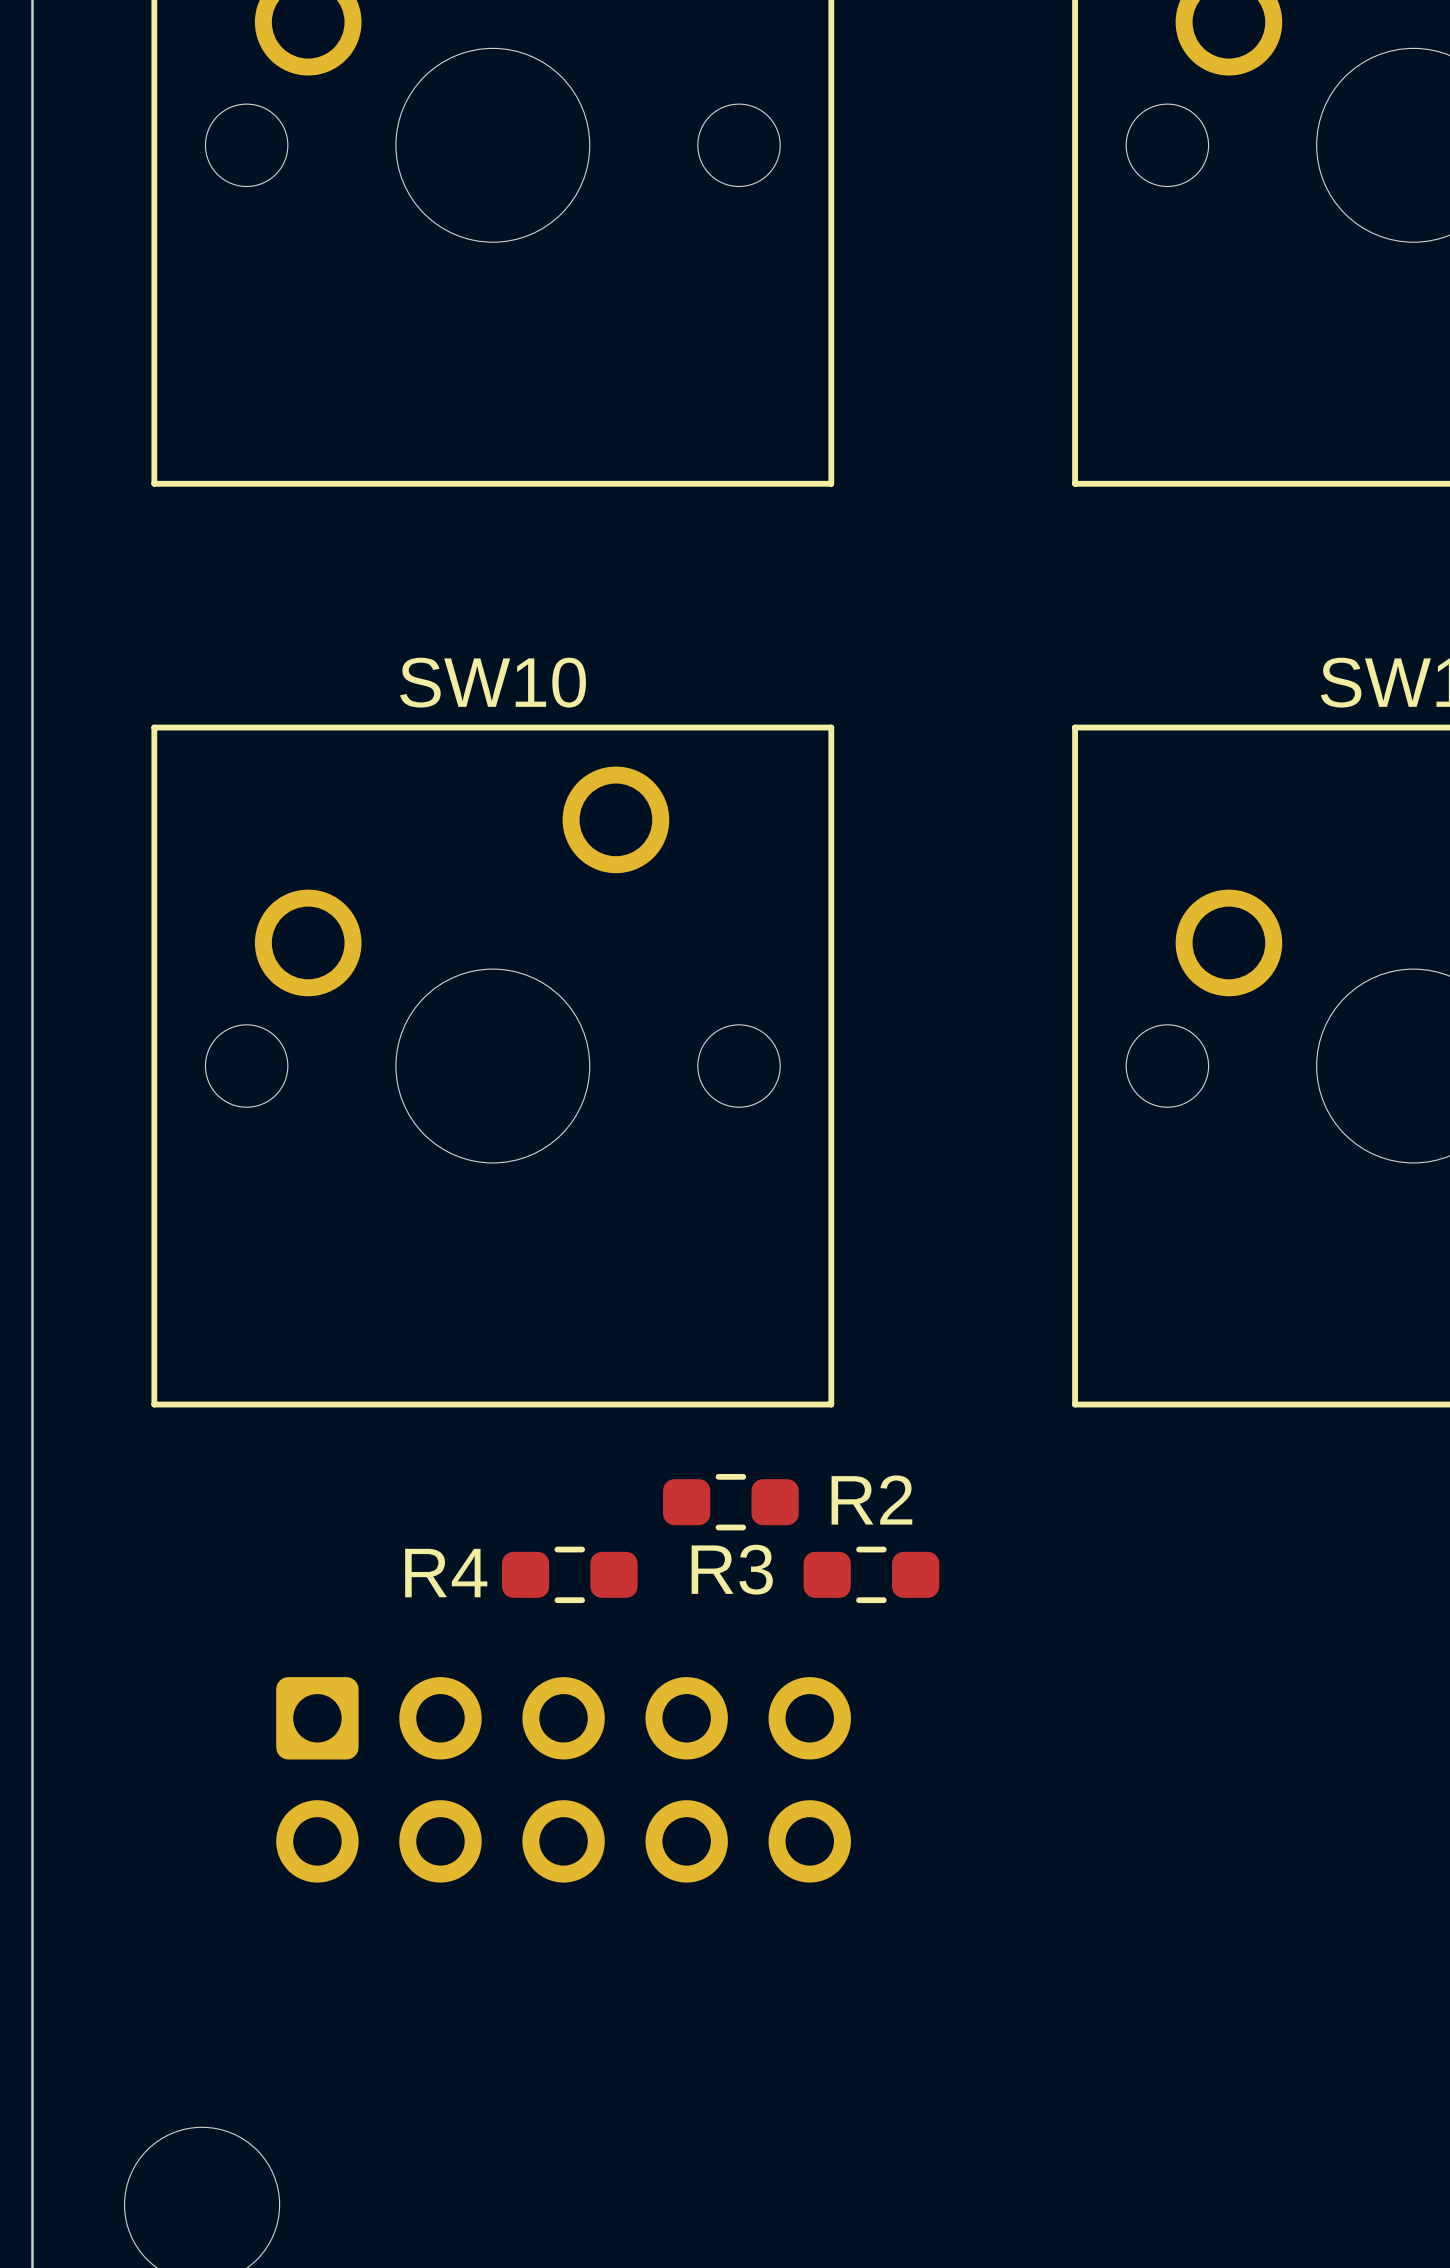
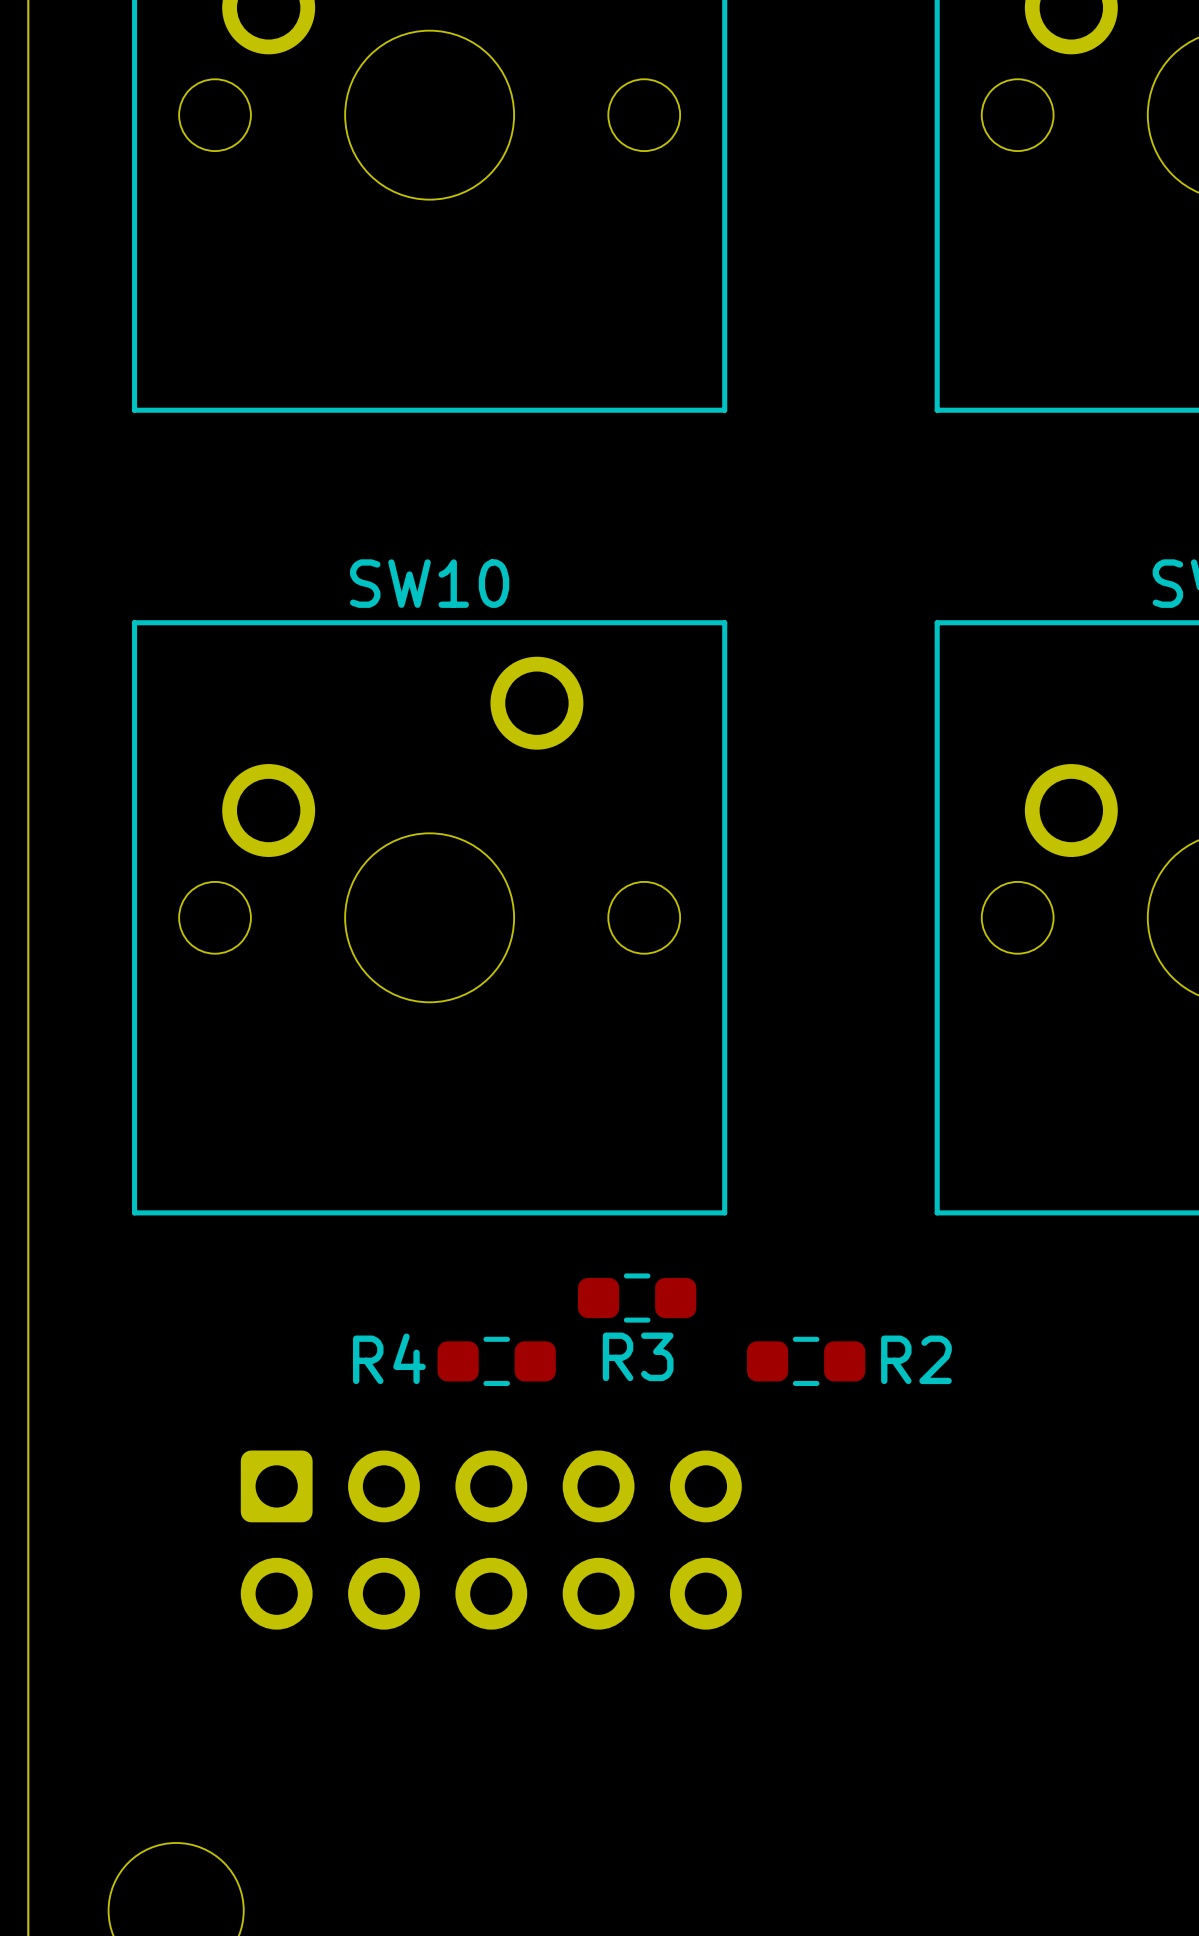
R2 name position: R2 (871, 1499) -> R2 (916, 1359)
R2 position: (871, 1574) -> (806, 1361)

